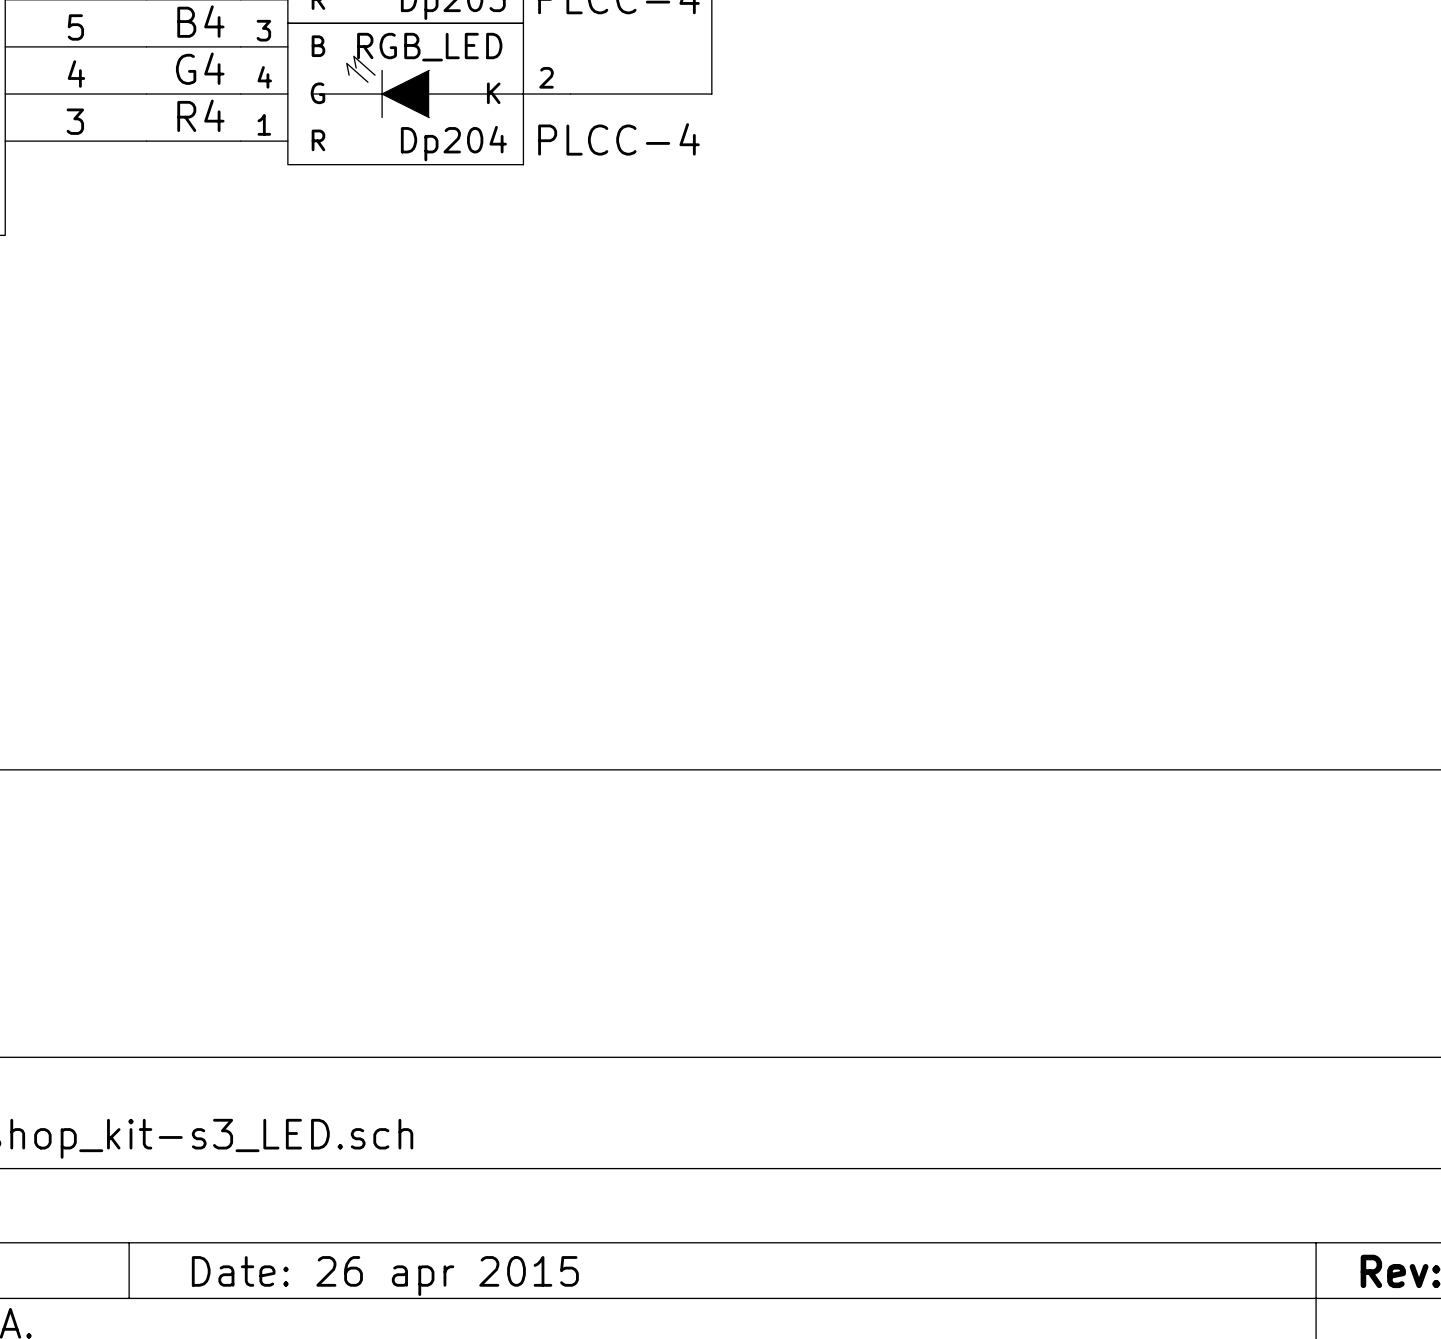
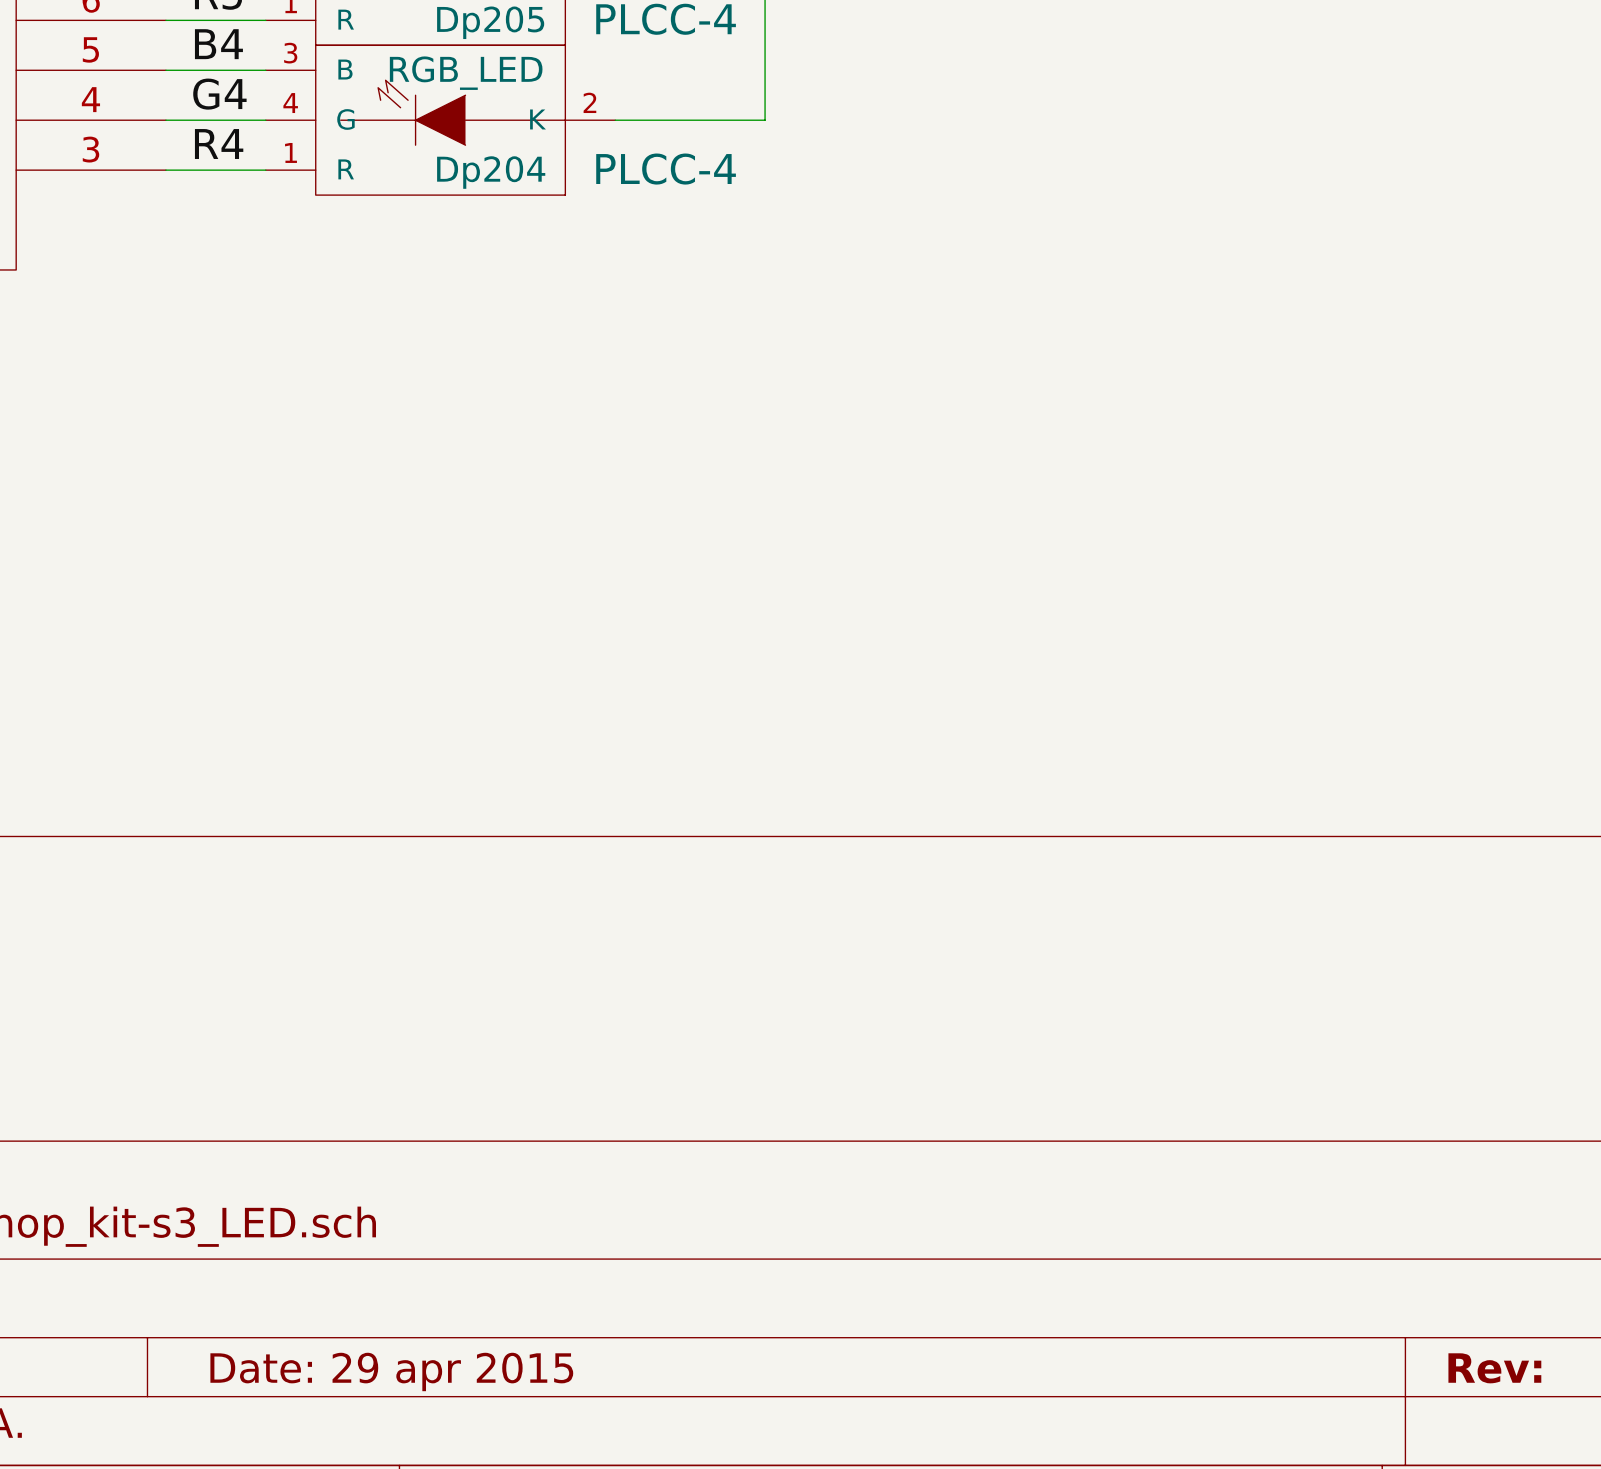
title block: Date: 26 apr 2015 (385, 1276) -> Date: 29 apr 2015 (391, 1371)

